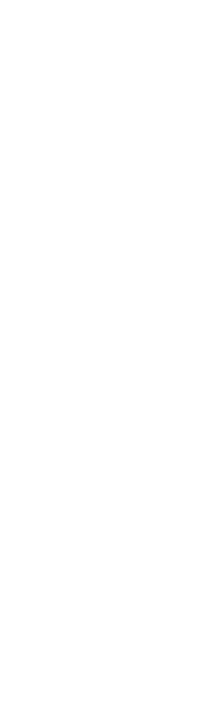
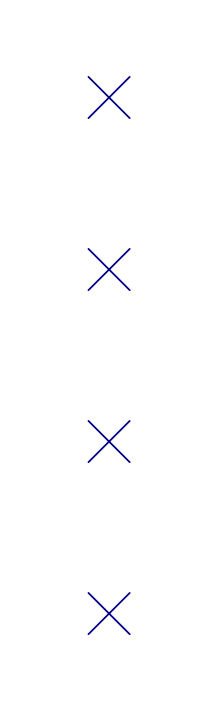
no-connect mark: none -> (109, 97)
no-connect mark: none -> (109, 269)
no-connect mark: none -> (109, 441)
no-connect mark: none -> (109, 613)

